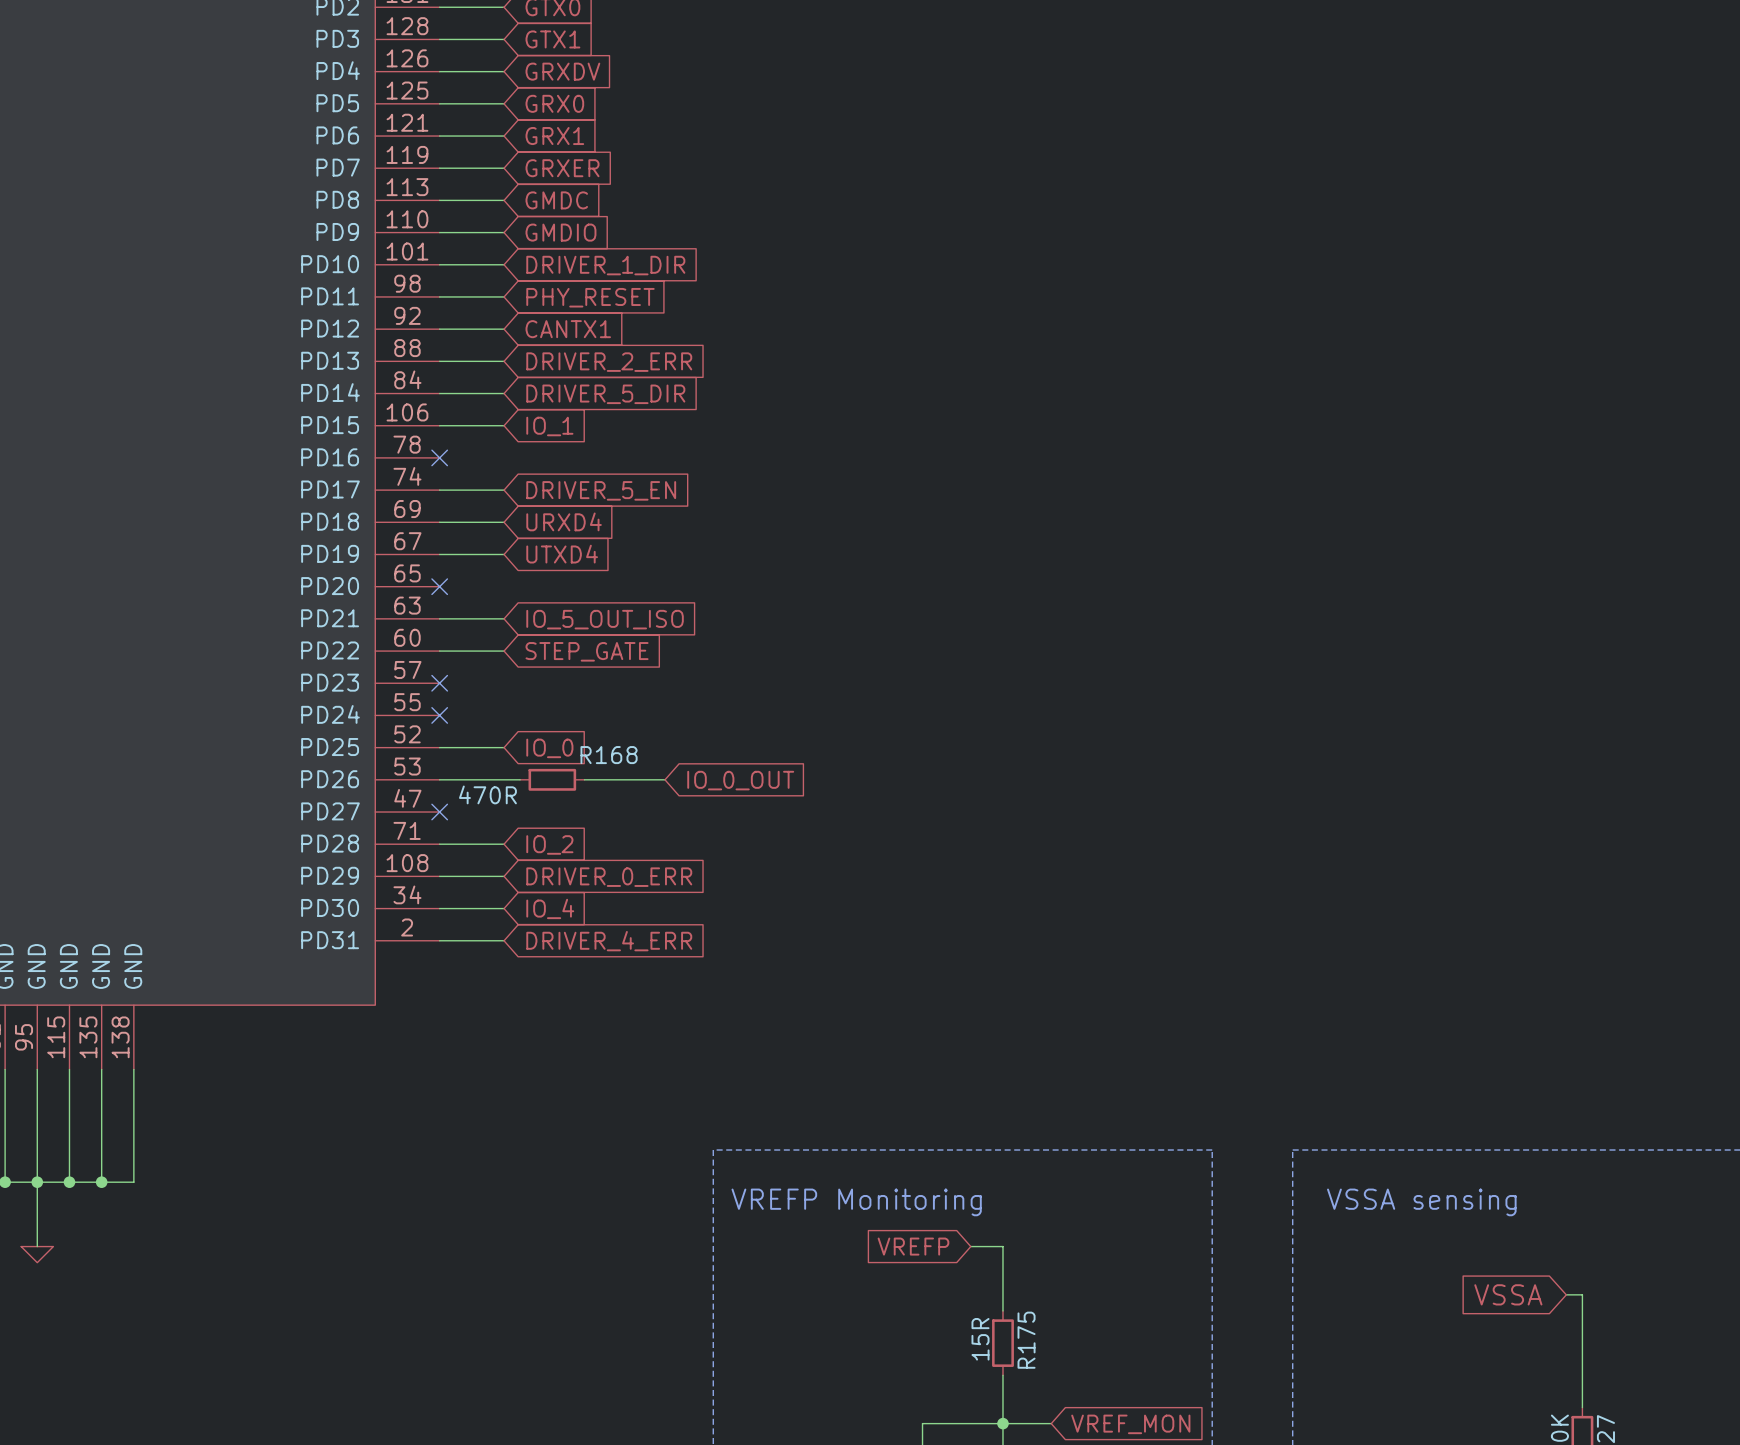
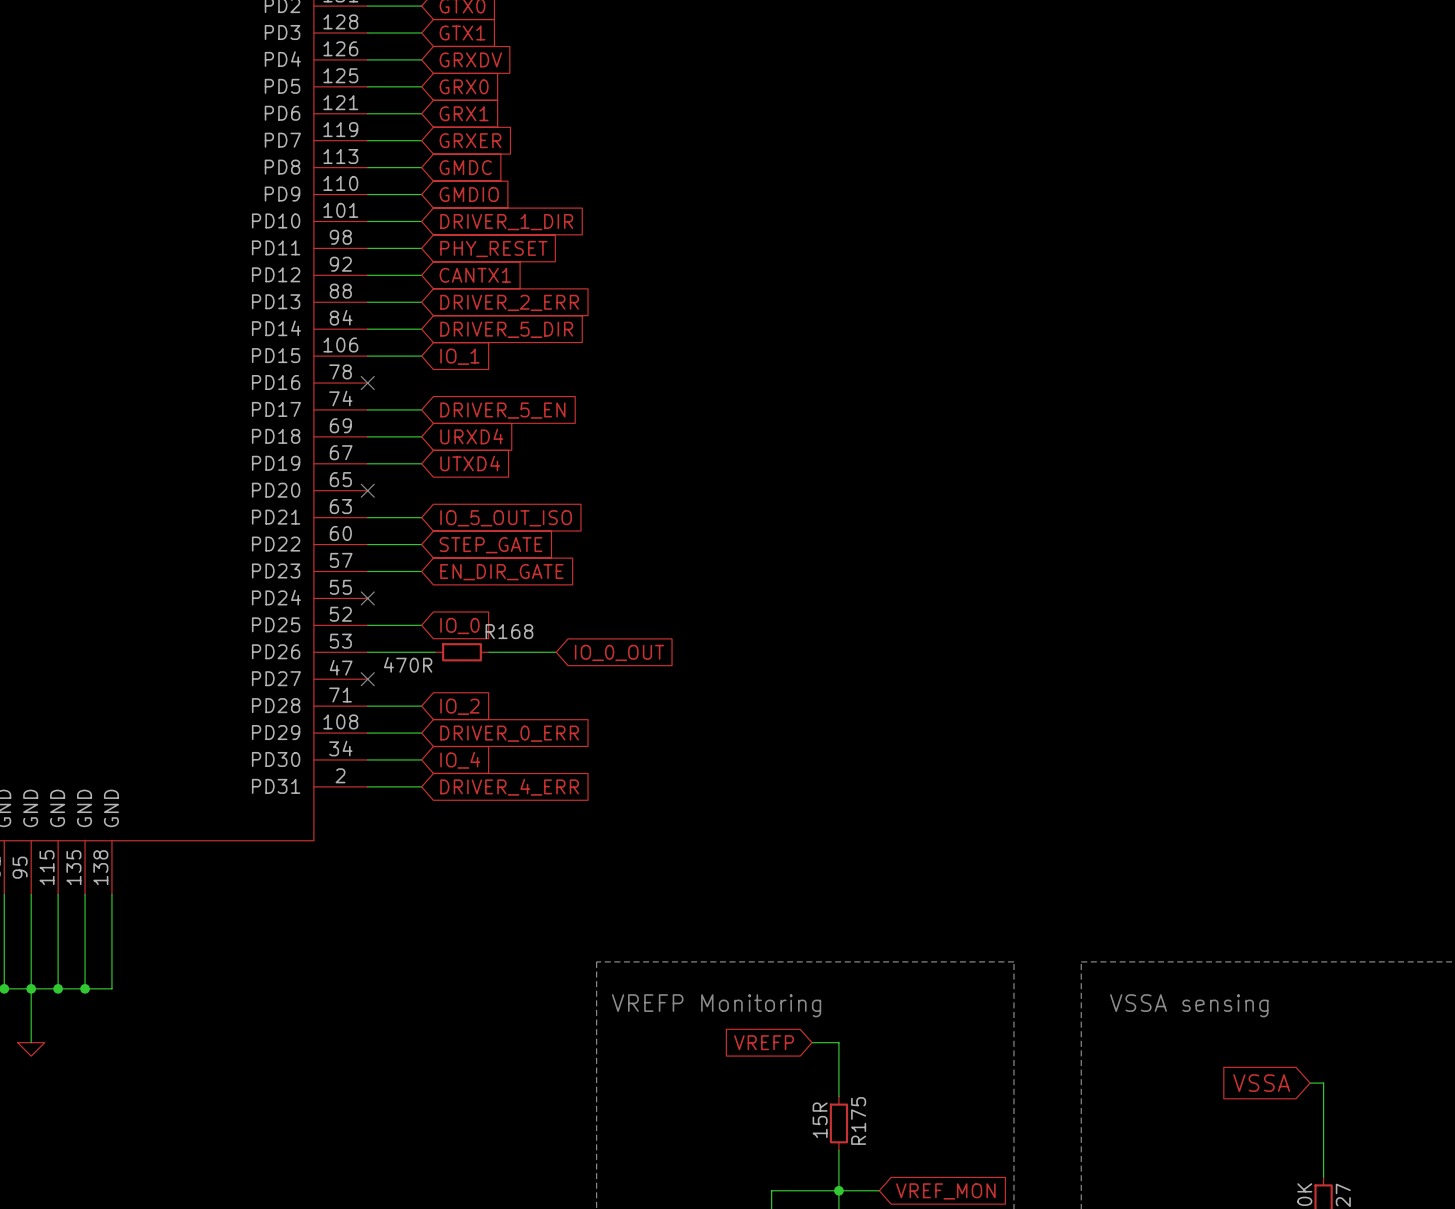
wire: none -> (367, 571) (421, 571)
no-connect mark: (439, 683) -> none
global label: none -> EN_DIR_GATE (501, 572)

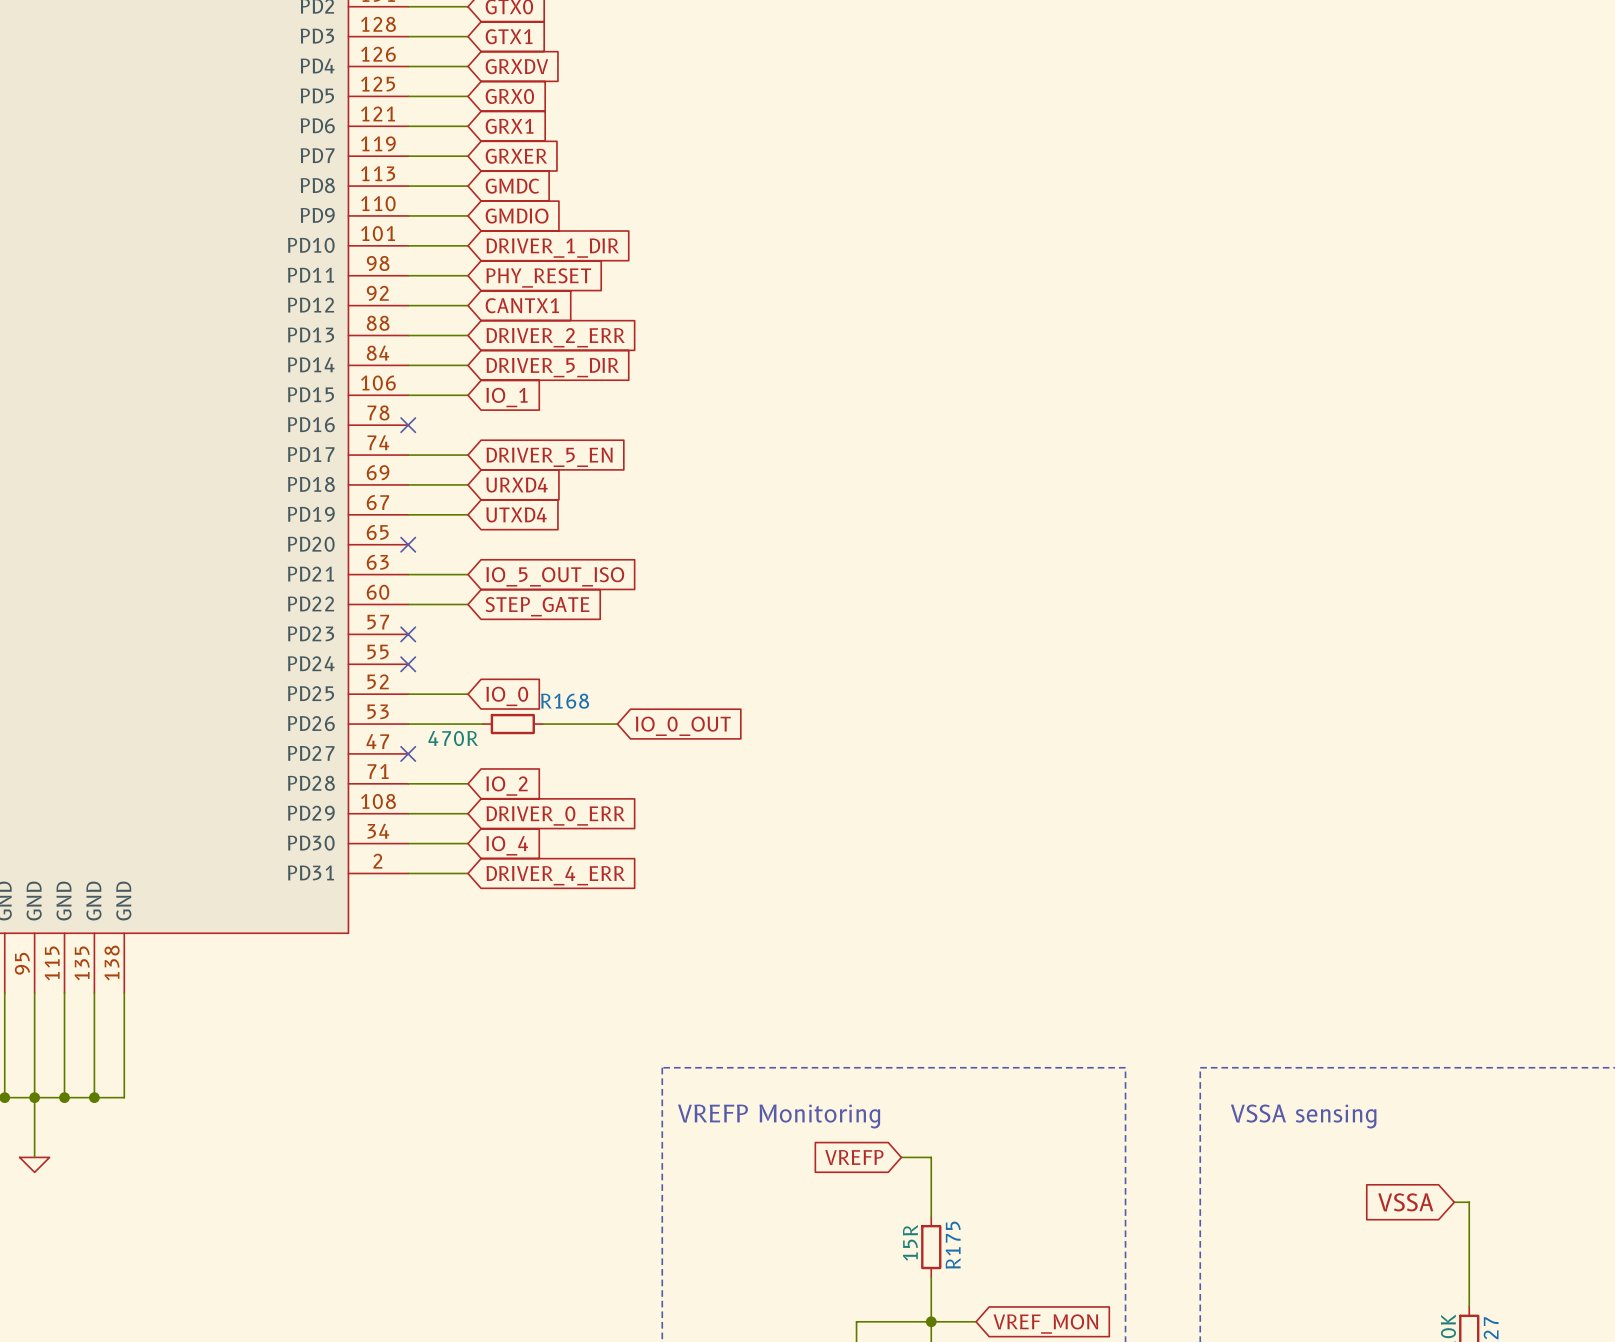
wire: (367, 571) (421, 571) -> none
no-connect mark: none -> (408, 634)
global label: EN_DIR_GATE (501, 572) -> none

